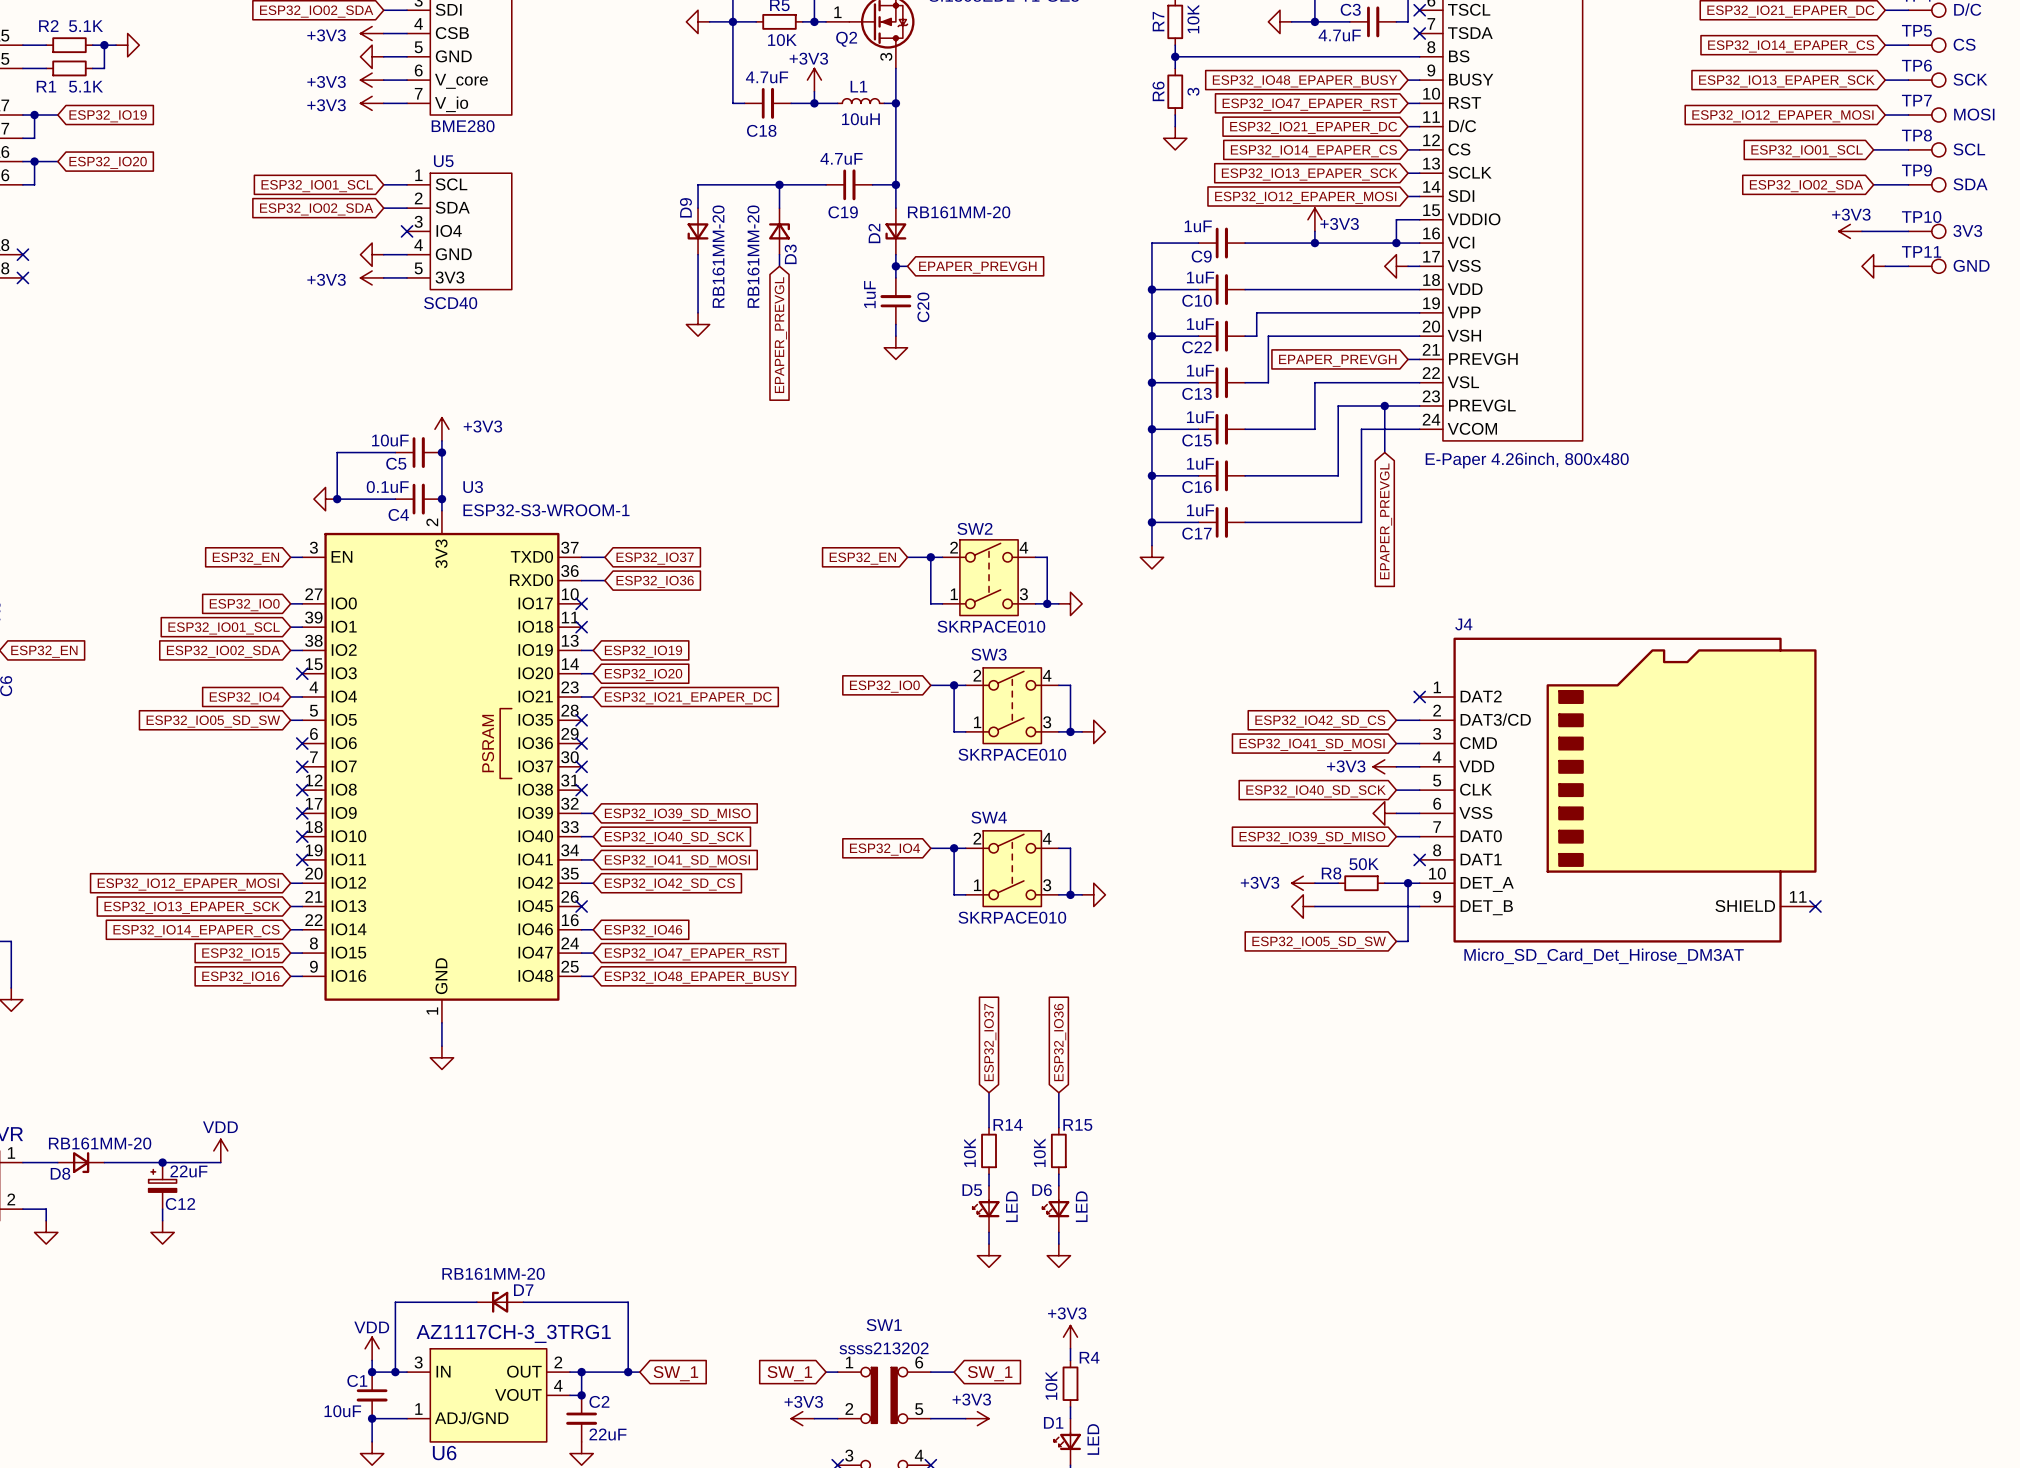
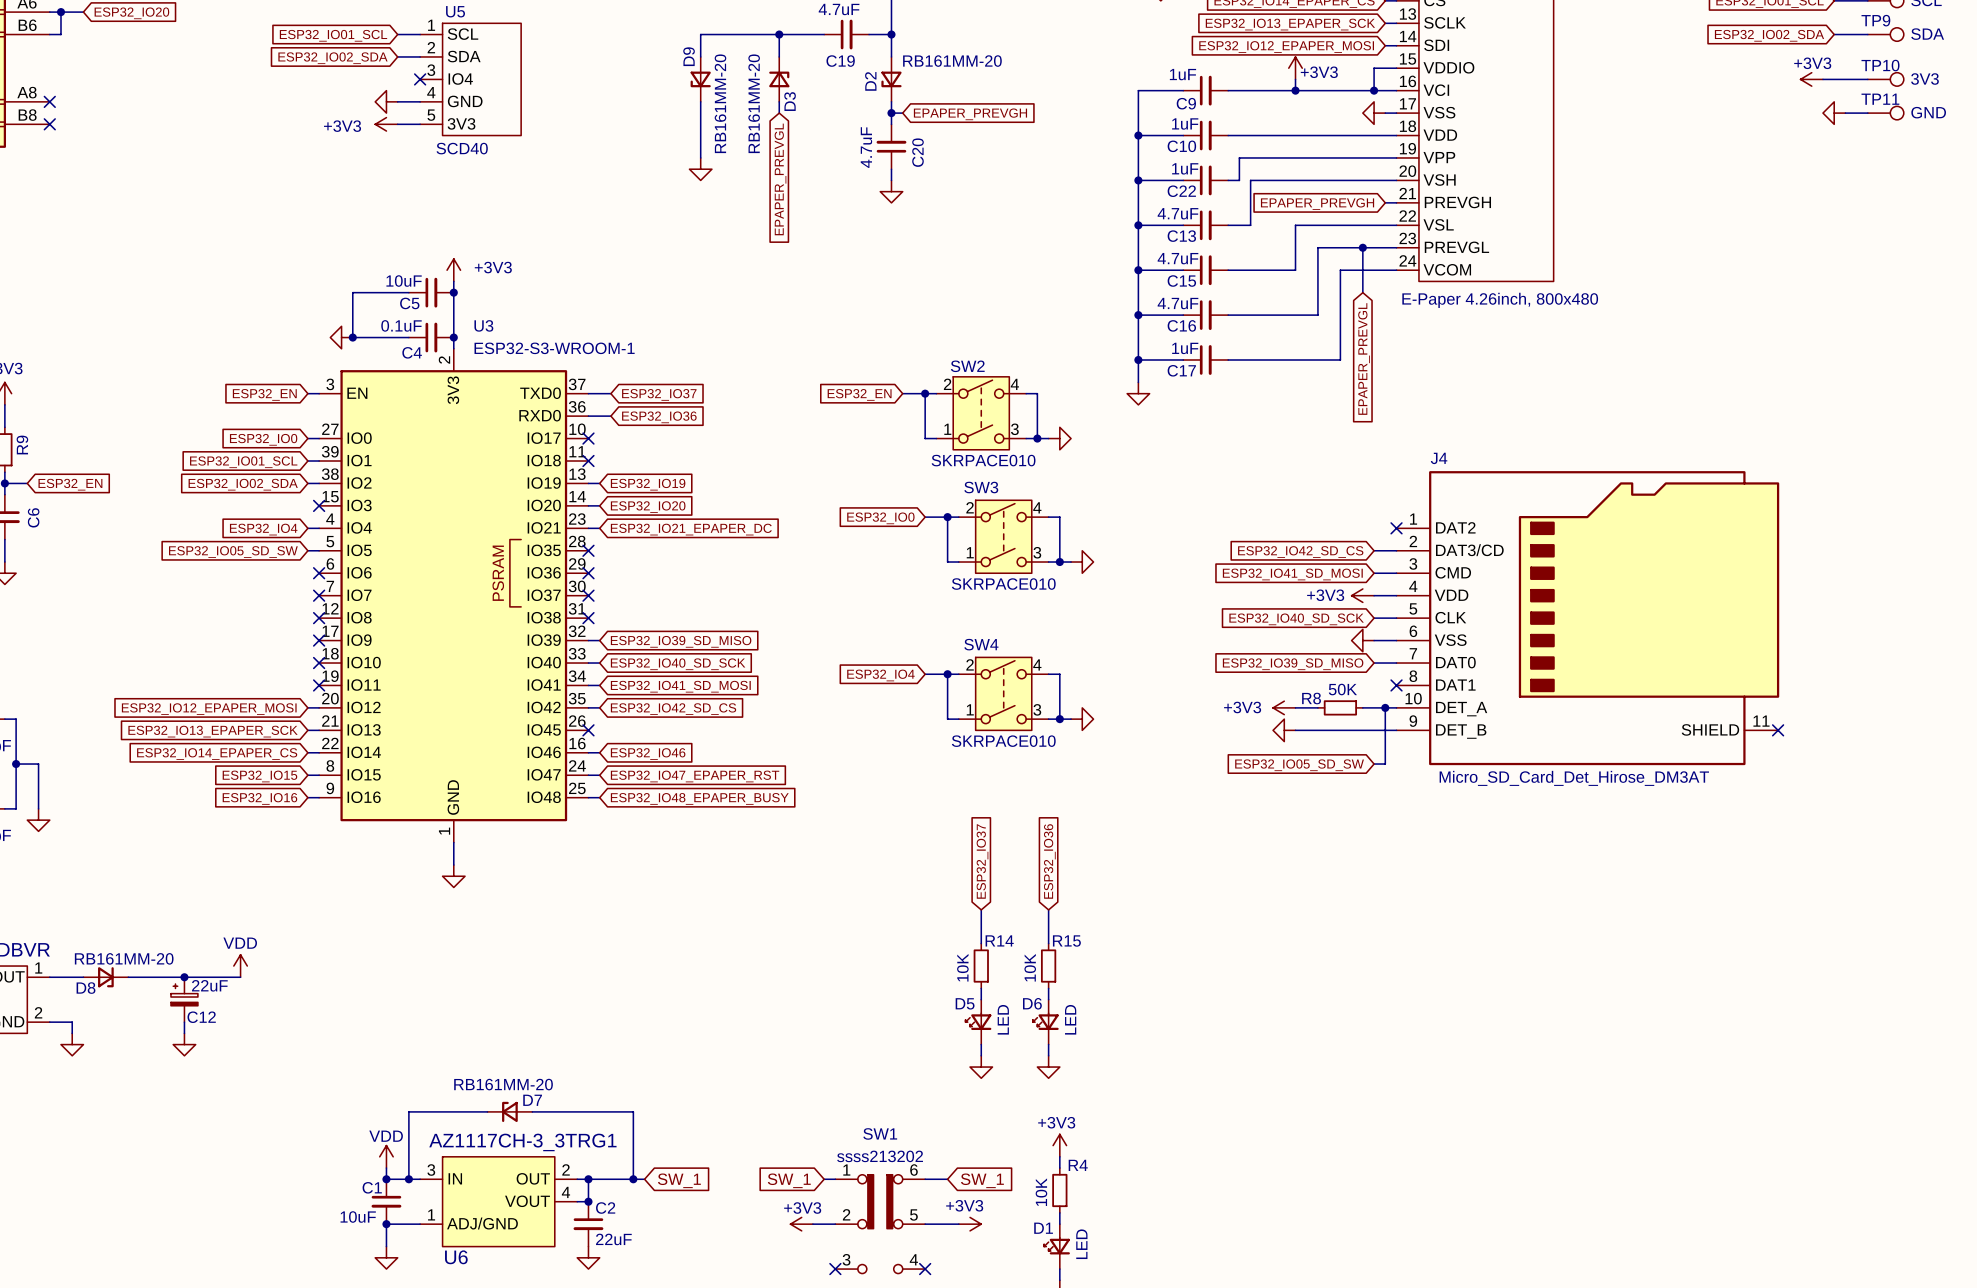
C20 value: 1uF (869, 294) -> 4.7uF (866, 147)
C13 value: 1uF (1200, 370) -> 4.7uF (1177, 213)
C15 value: 1uF (1200, 417) -> 4.7uF (1177, 258)
C16 value: 1uF (1200, 463) -> 4.7uF (1177, 303)

